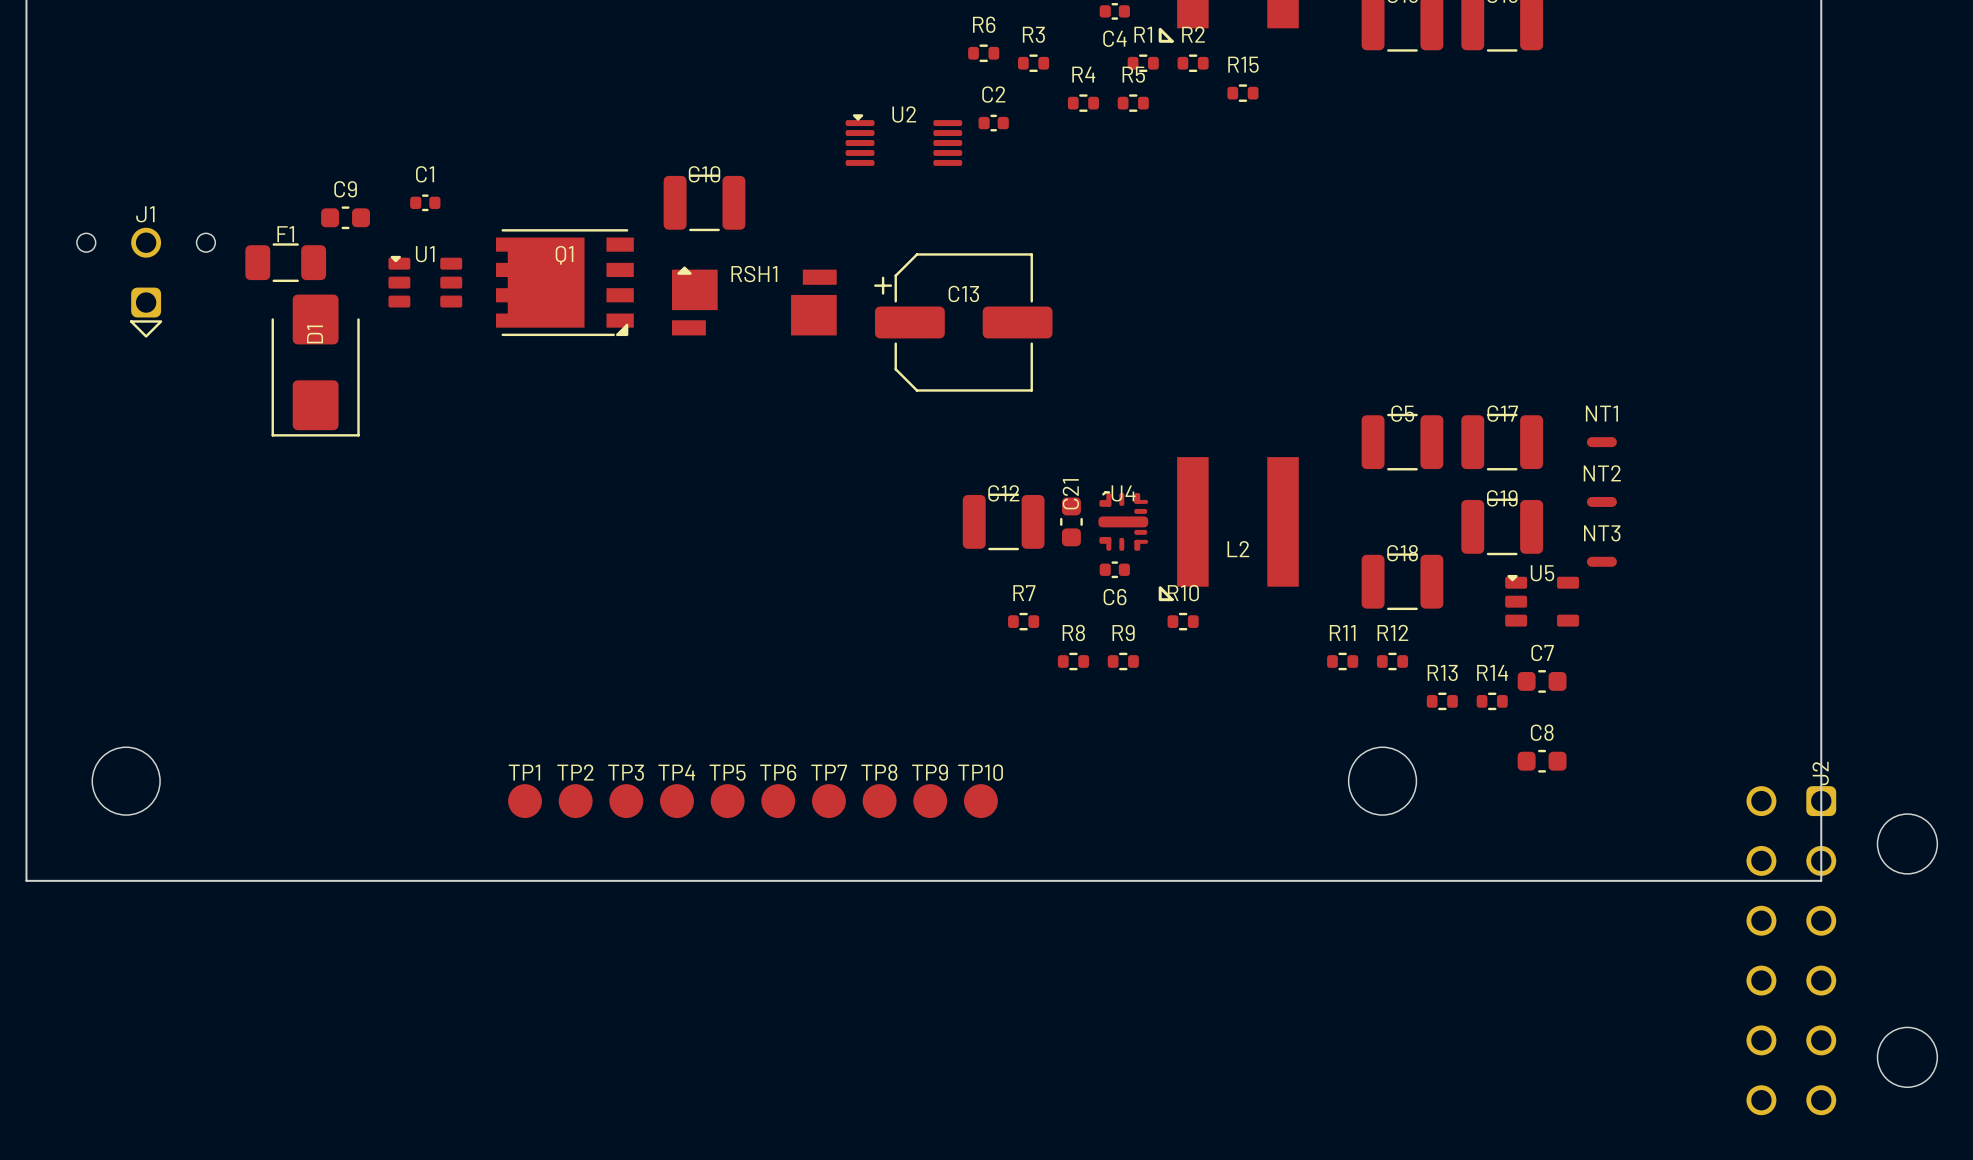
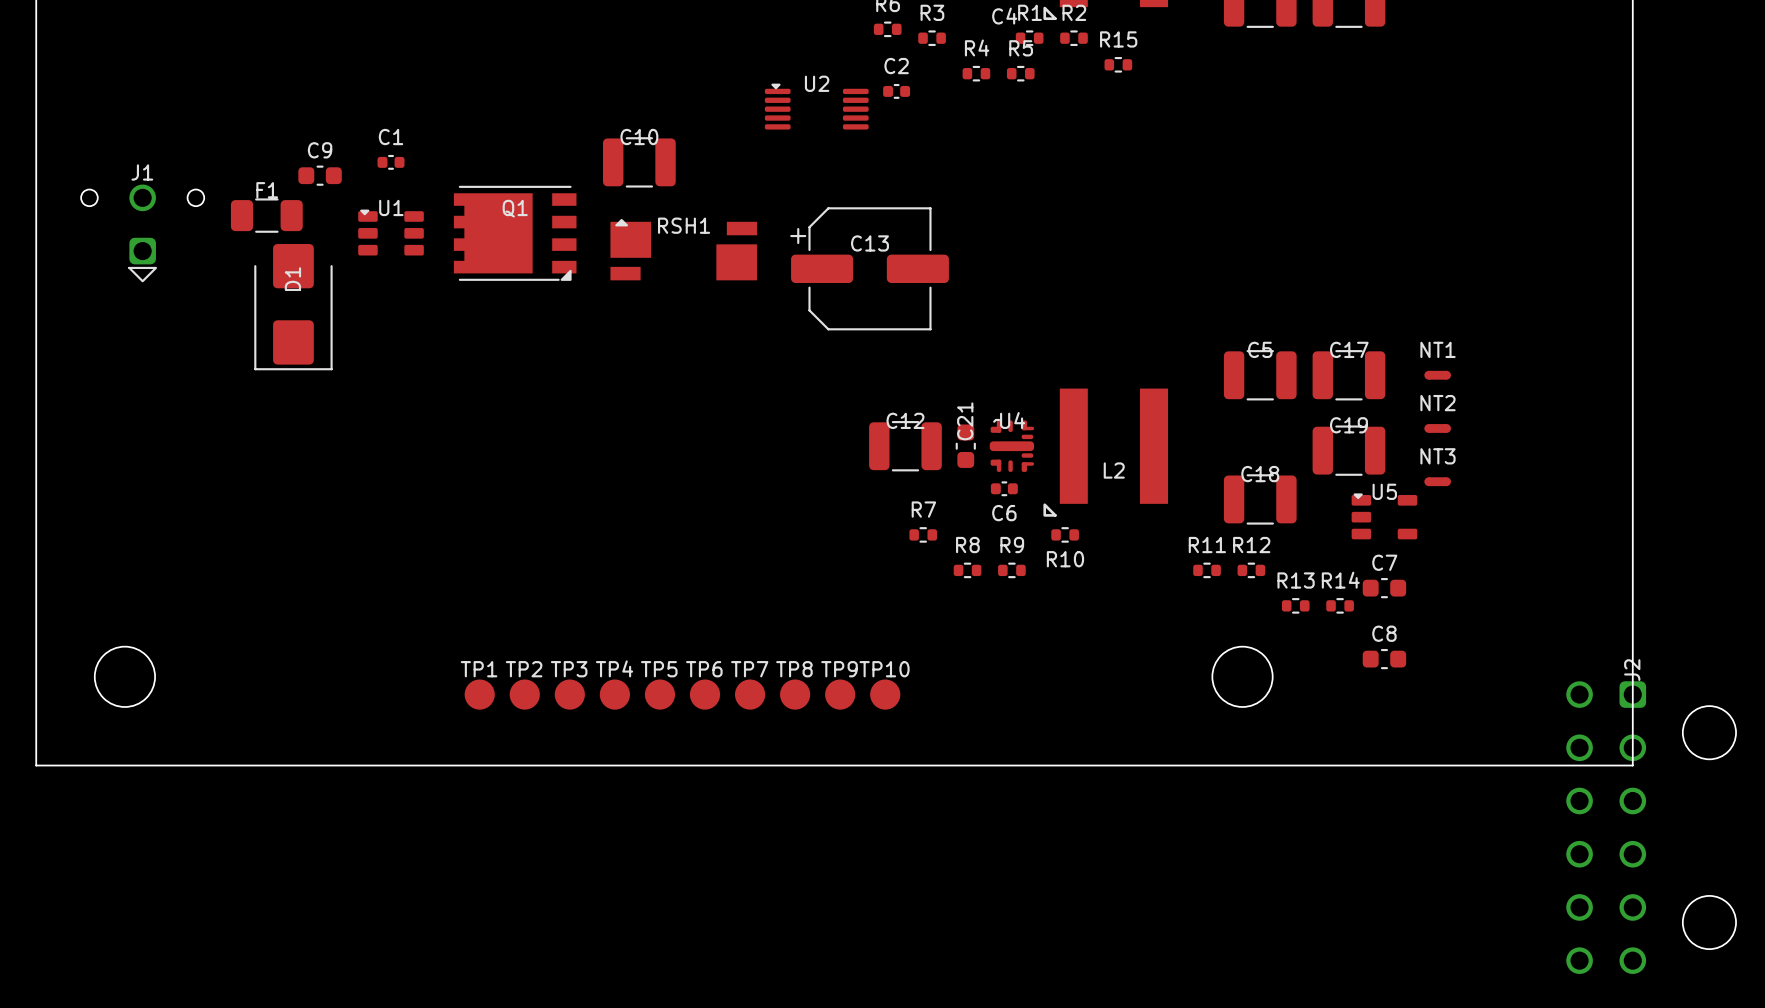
R10 name position: R10 (1183, 593) -> R10 (1065, 559)

